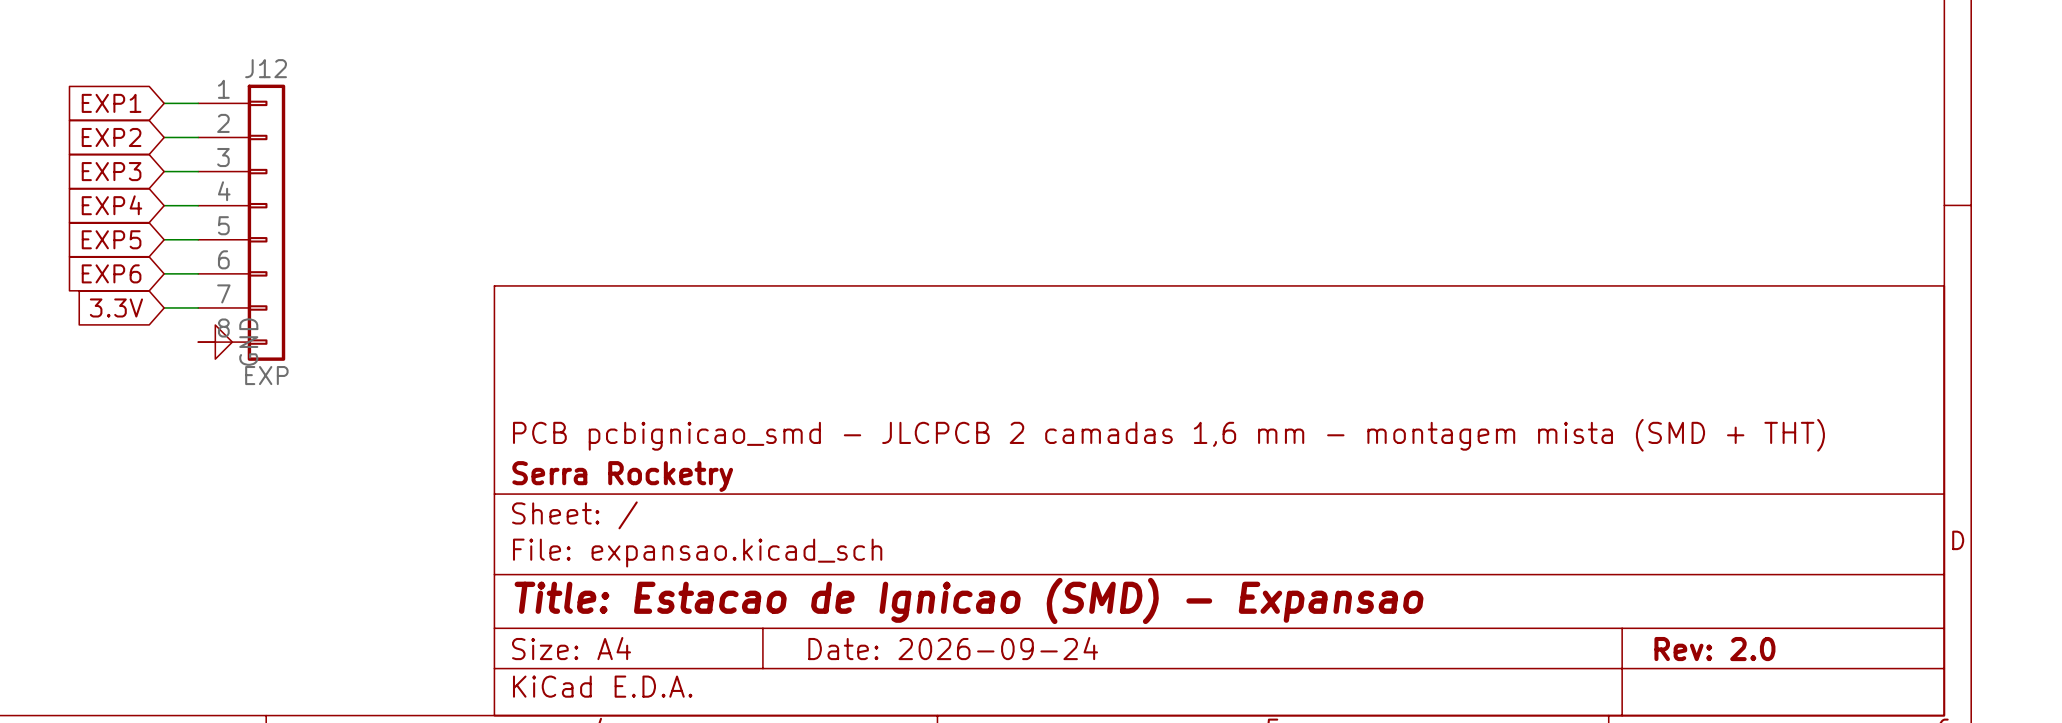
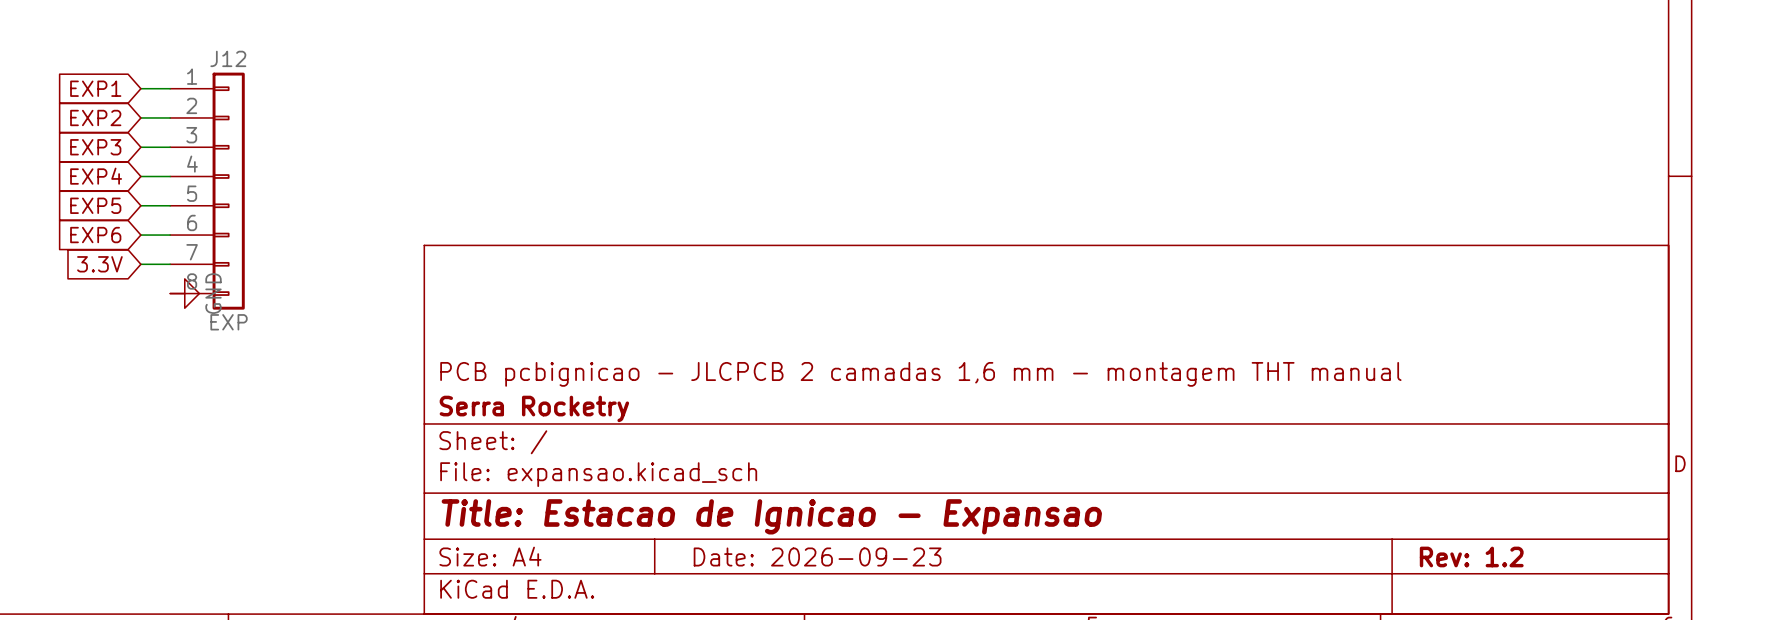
title block: PCB pcbignicao_smd - JLCPCB 2 camadas 1,6 mm - montagem mista (SMD + THT) (1168, 435) -> PCB pcbignicao - JLCPCB 2 camadas 1,6 mm - montagem THT manual (920, 374)
title block: Title: Estacao de Ignicao (SMD) - Expansao (969, 600) -> Title: Estacao de Ignicao - Expansao (771, 516)
title block: Date: 2026-09-24 (953, 648) -> Date: 2026-09-23 (817, 556)
title block: Rev: 2.0 (1714, 649) -> Rev: 1.2 (1471, 556)

